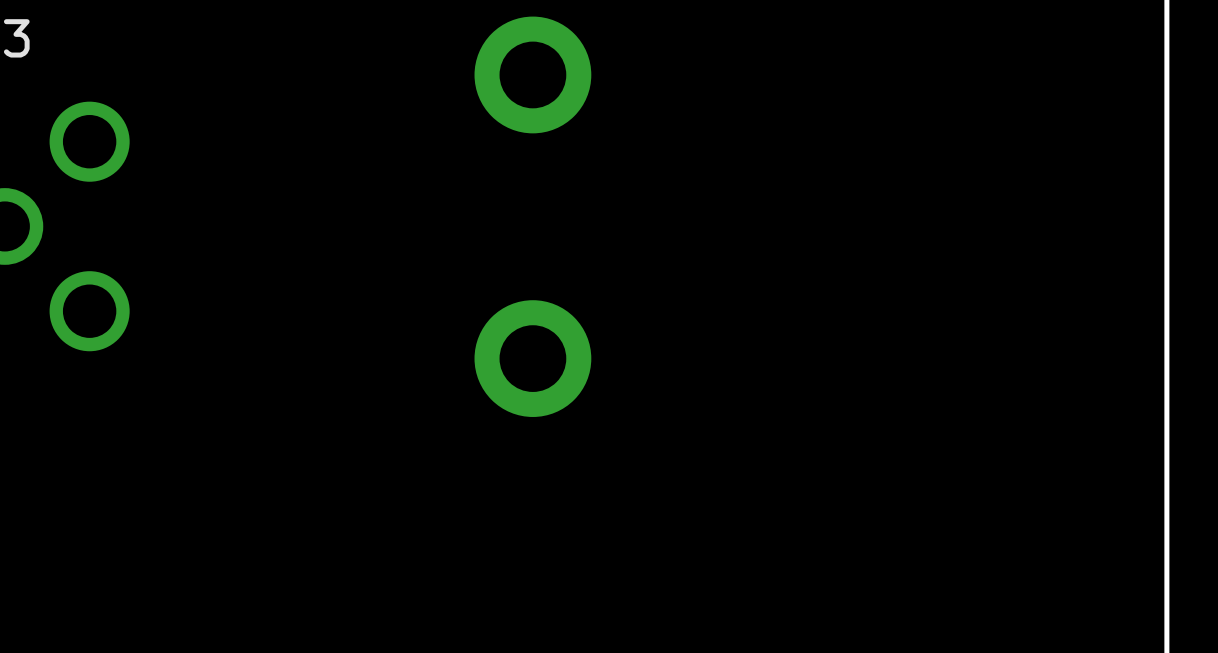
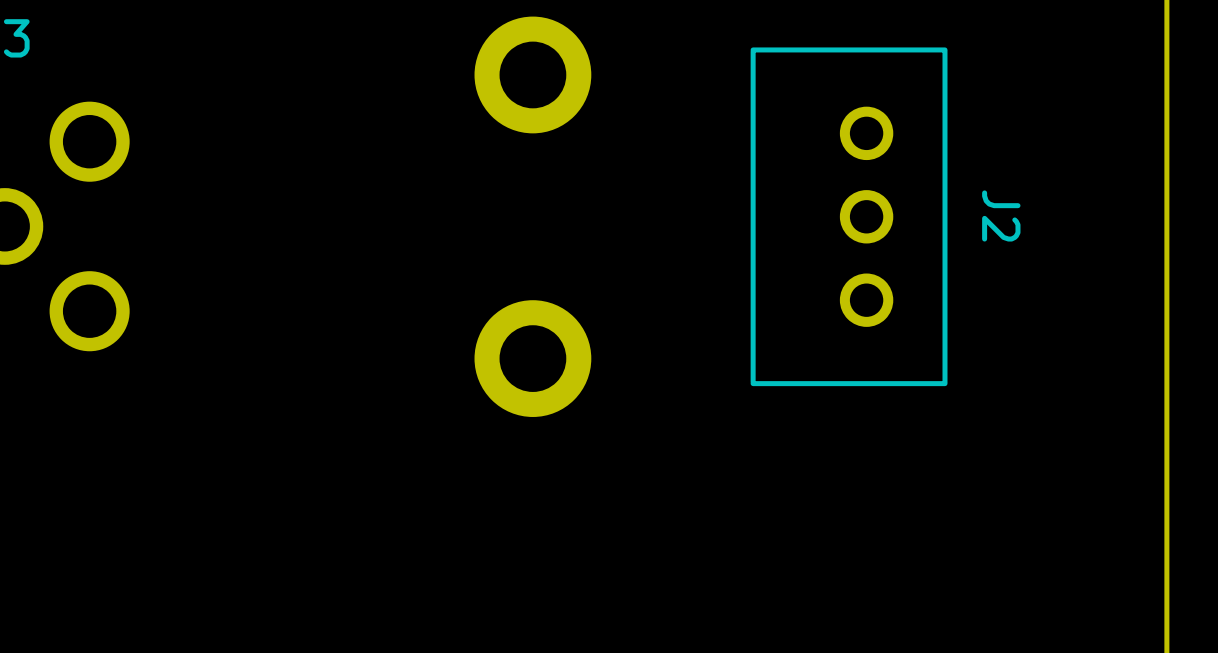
J2: none -> (849, 216)

